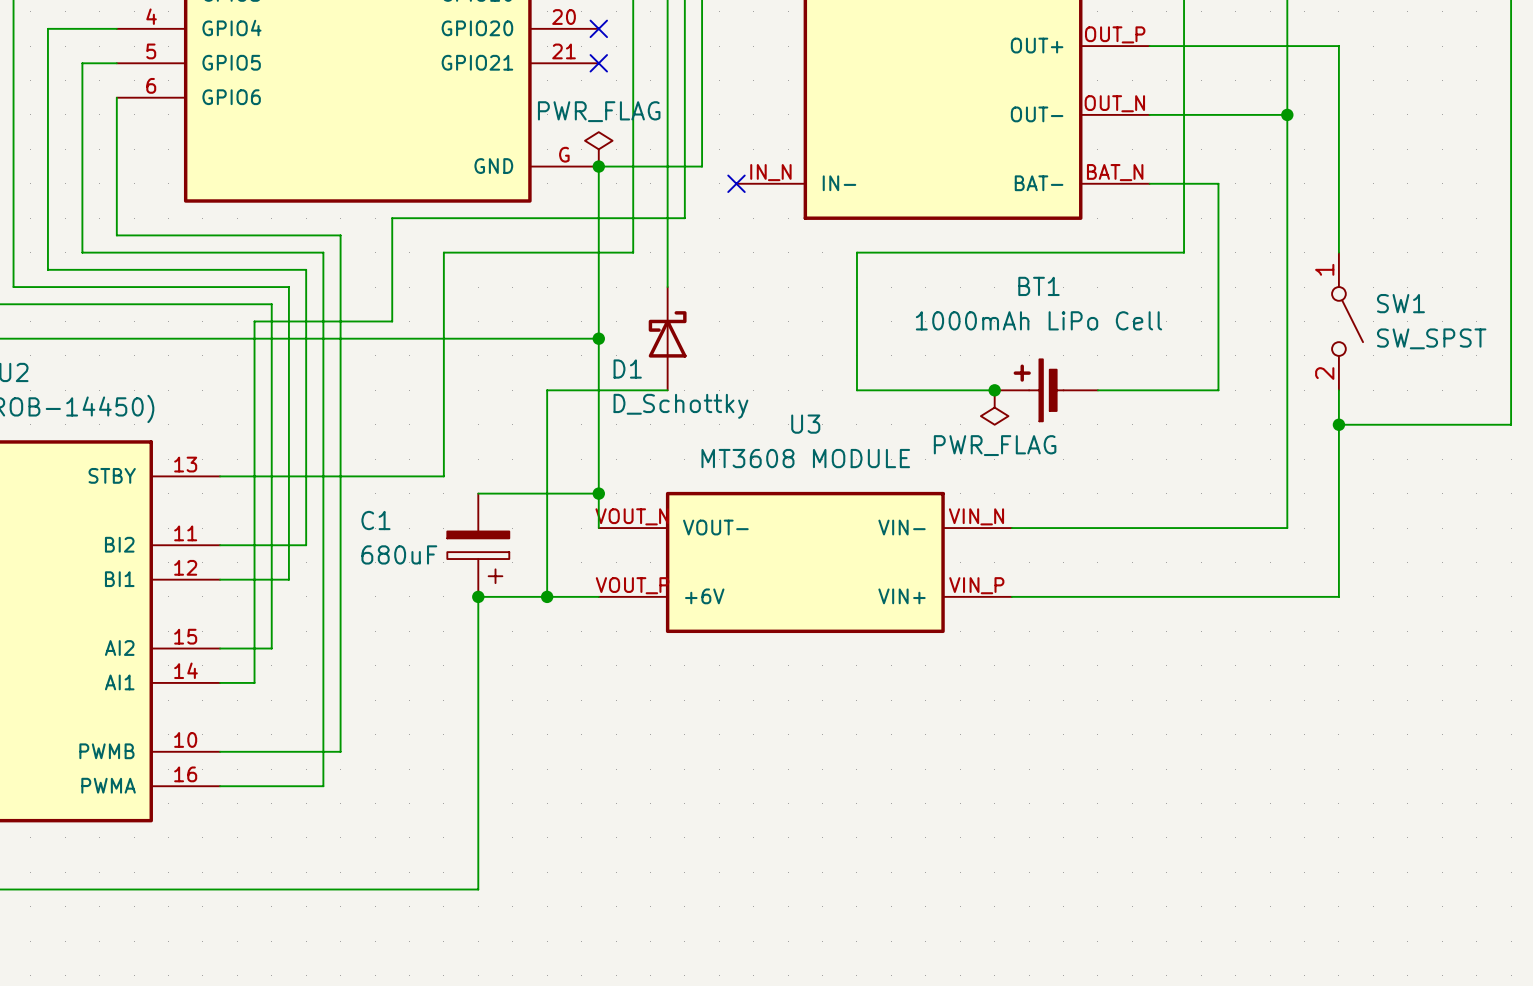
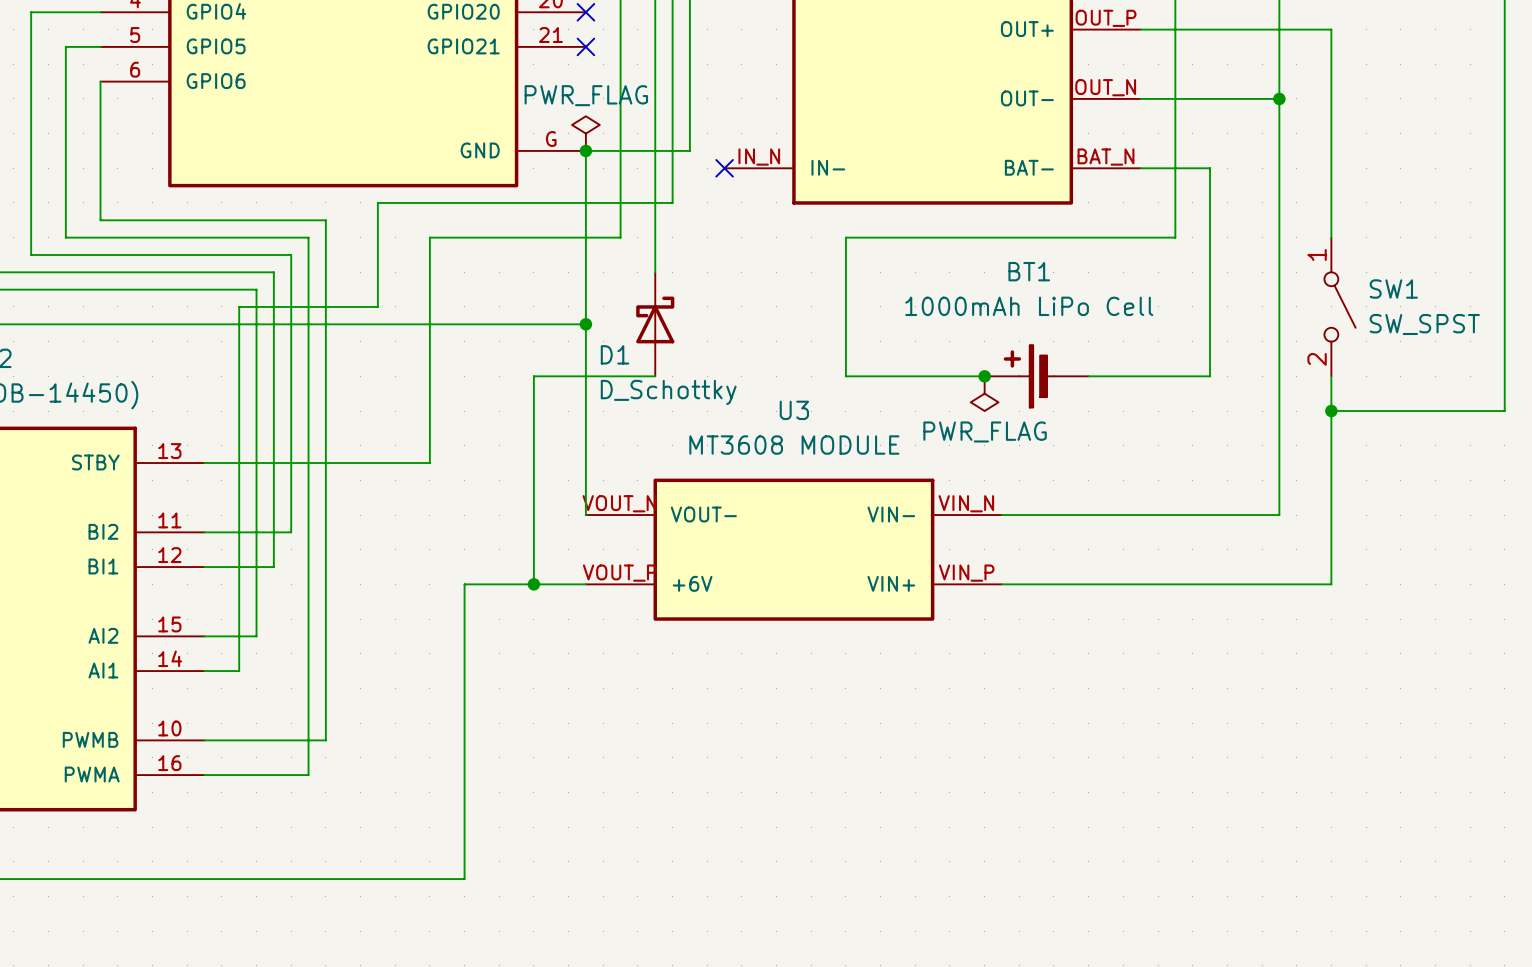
wire: (478, 493) (598, 493) -> none
junction: (598, 493) -> none
C1: 680uF (478, 545) -> none
junction: (478, 596) -> none

